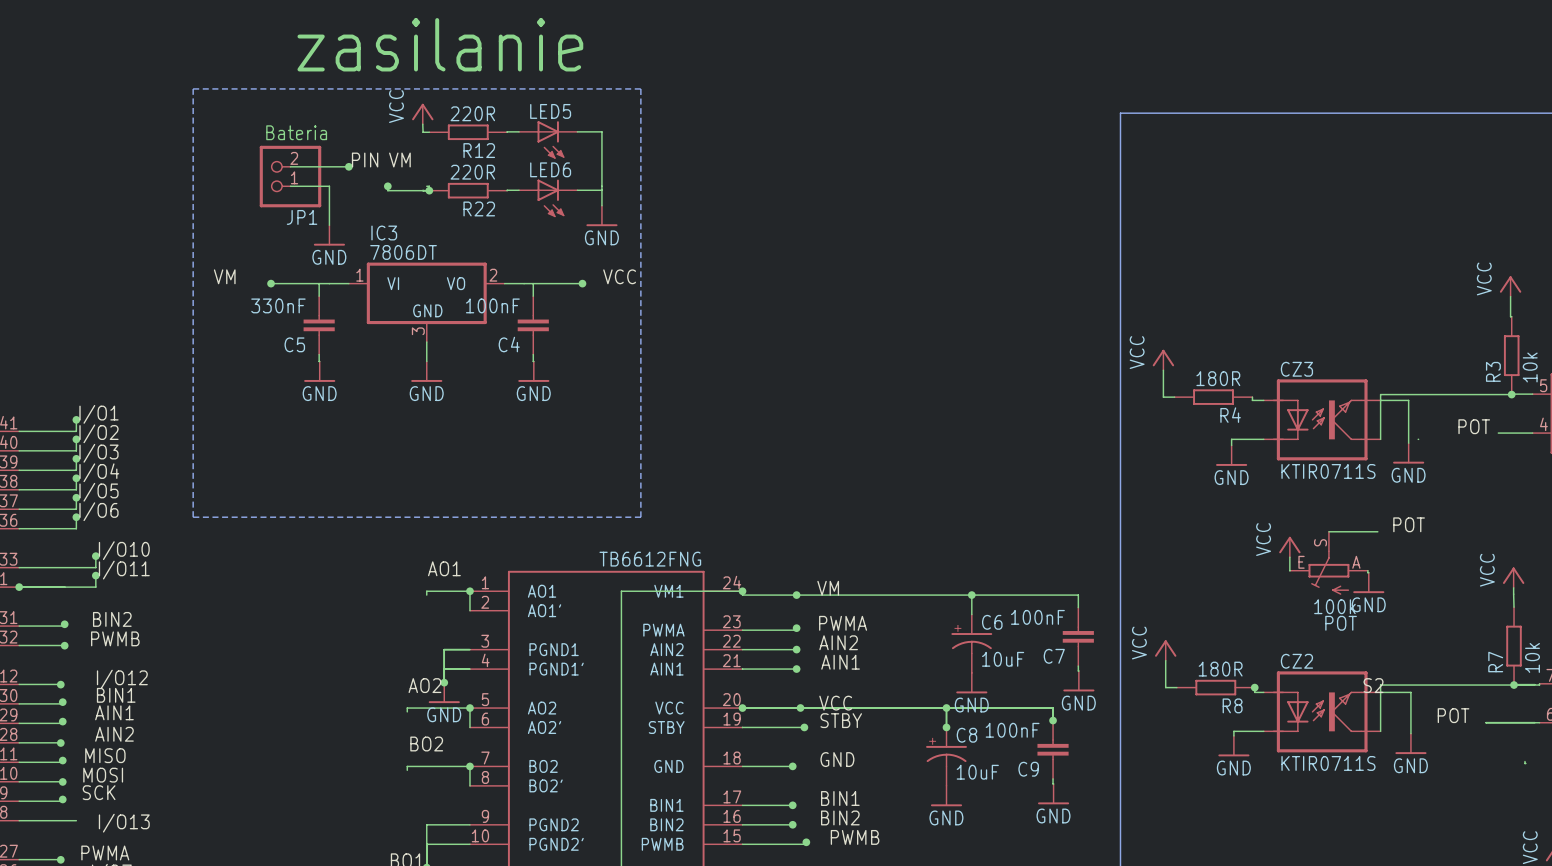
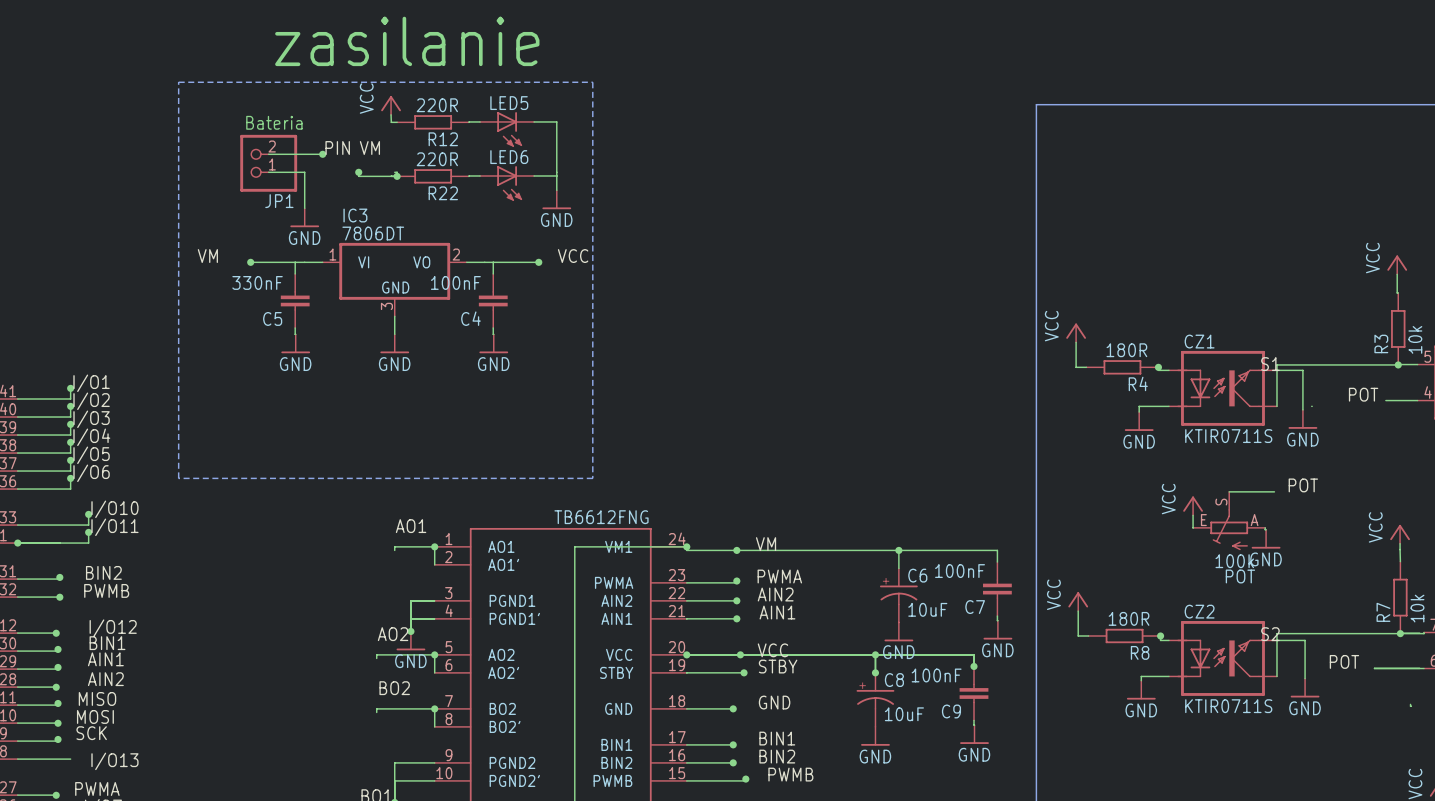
CZ3 name: CZ3 (1296, 369) -> CZ1 (1199, 341)
label: none -> S1 (1270, 364)
junction: none -> (1158, 367)

